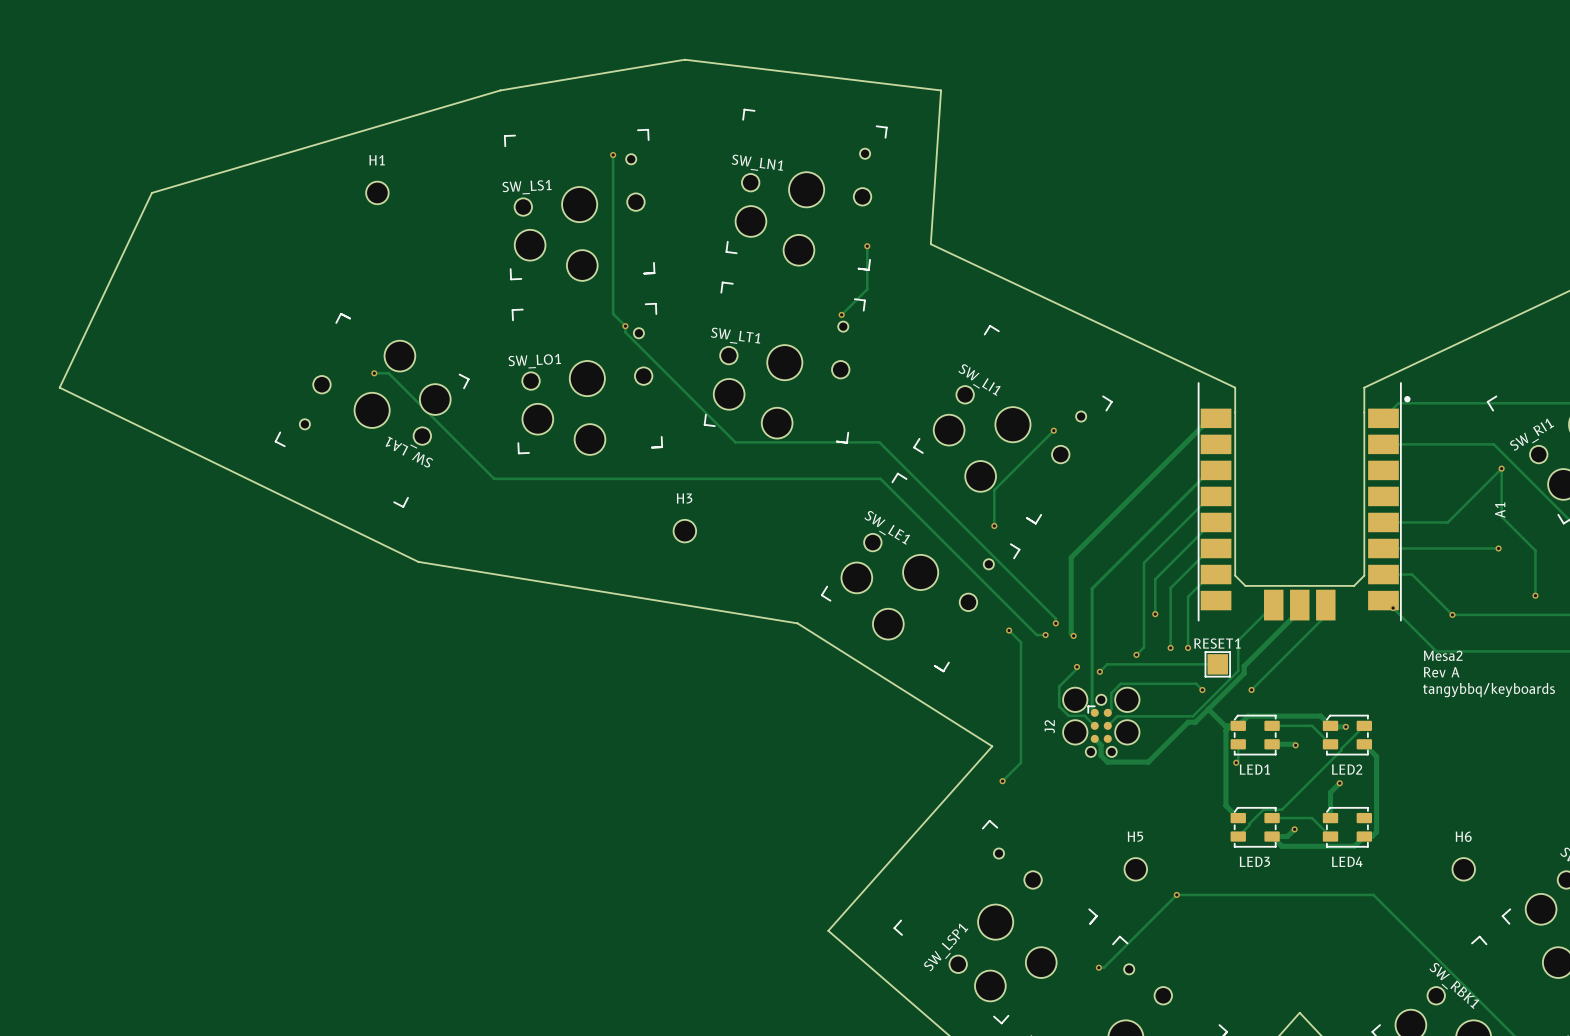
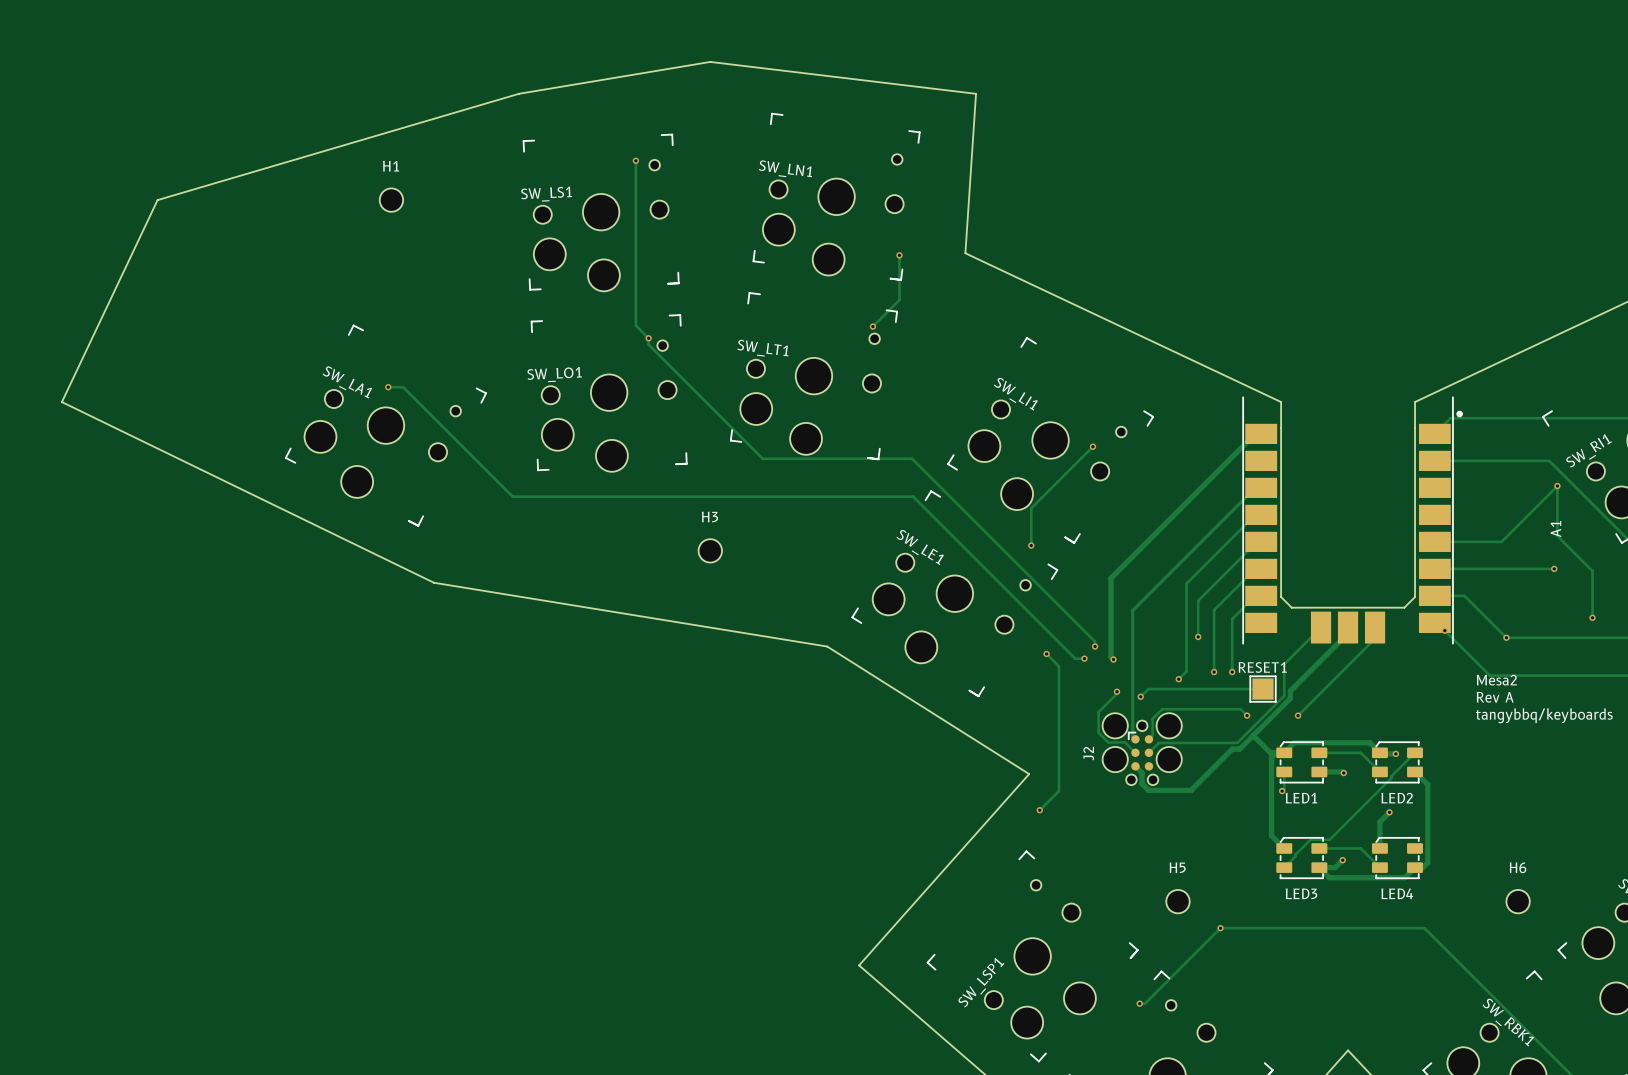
SW_LA1 rotation: 0° (372, 410) -> 180° (385, 425)

